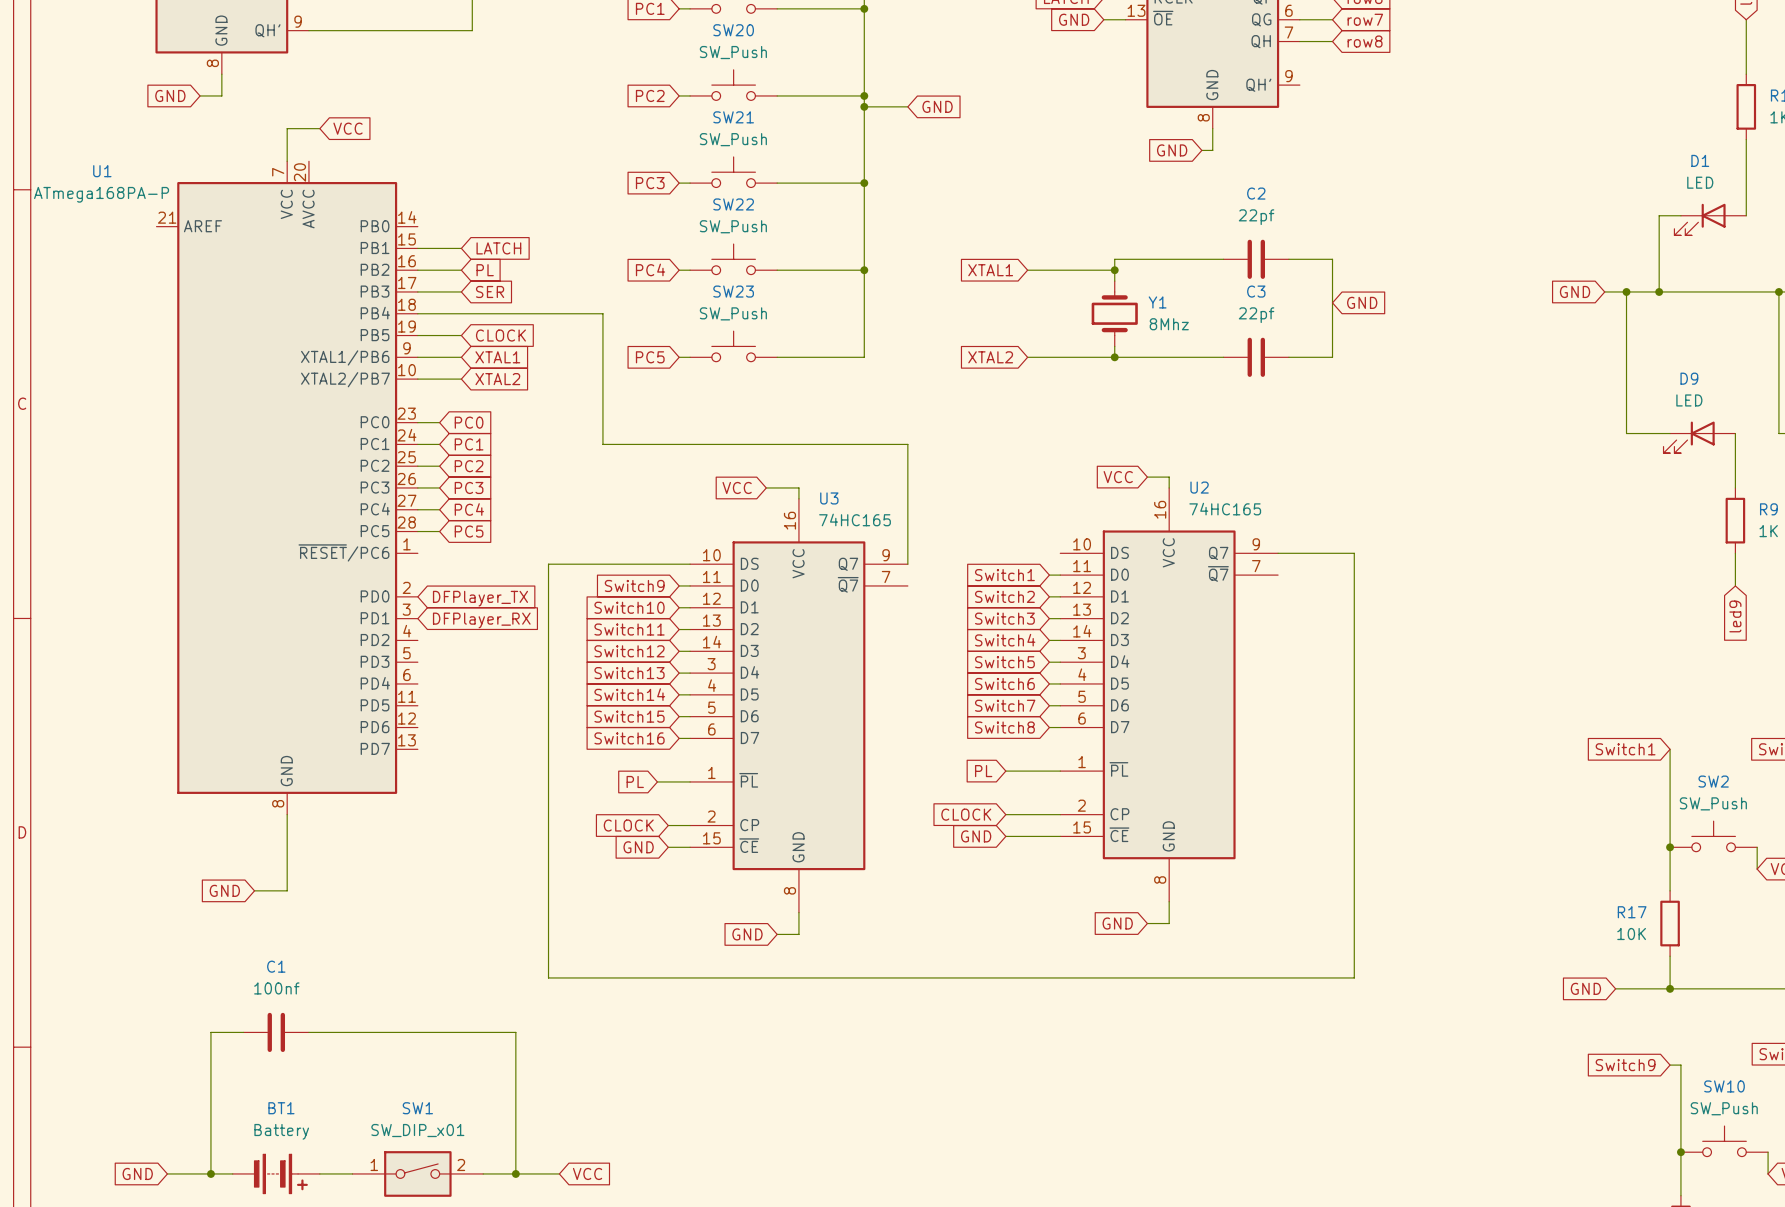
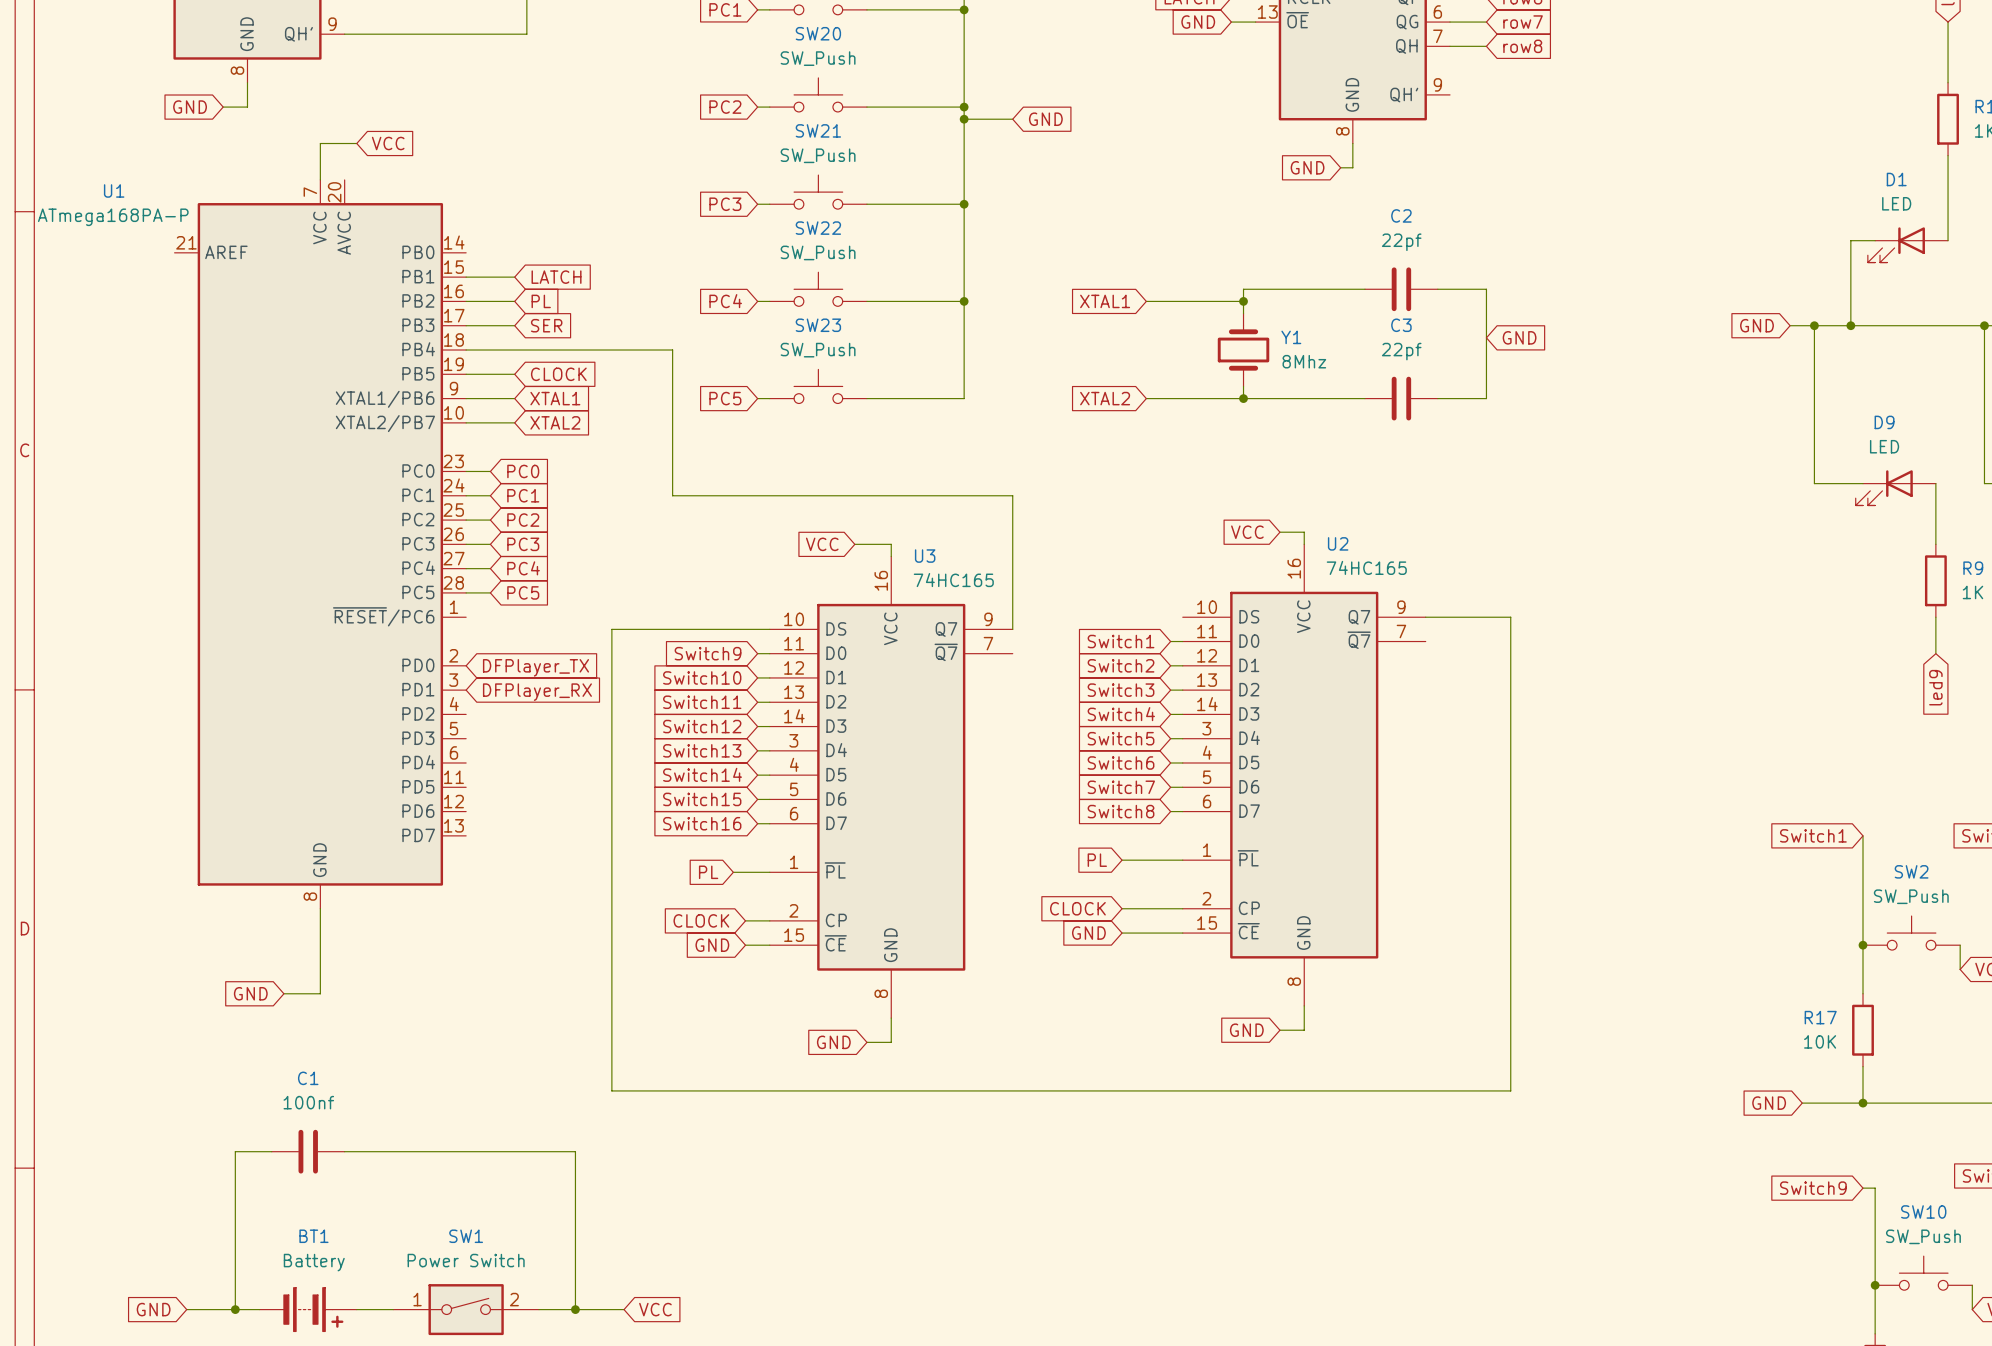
SW1 value: SW_DIP_x01 (417, 1130) -> Power Switch (466, 1260)

